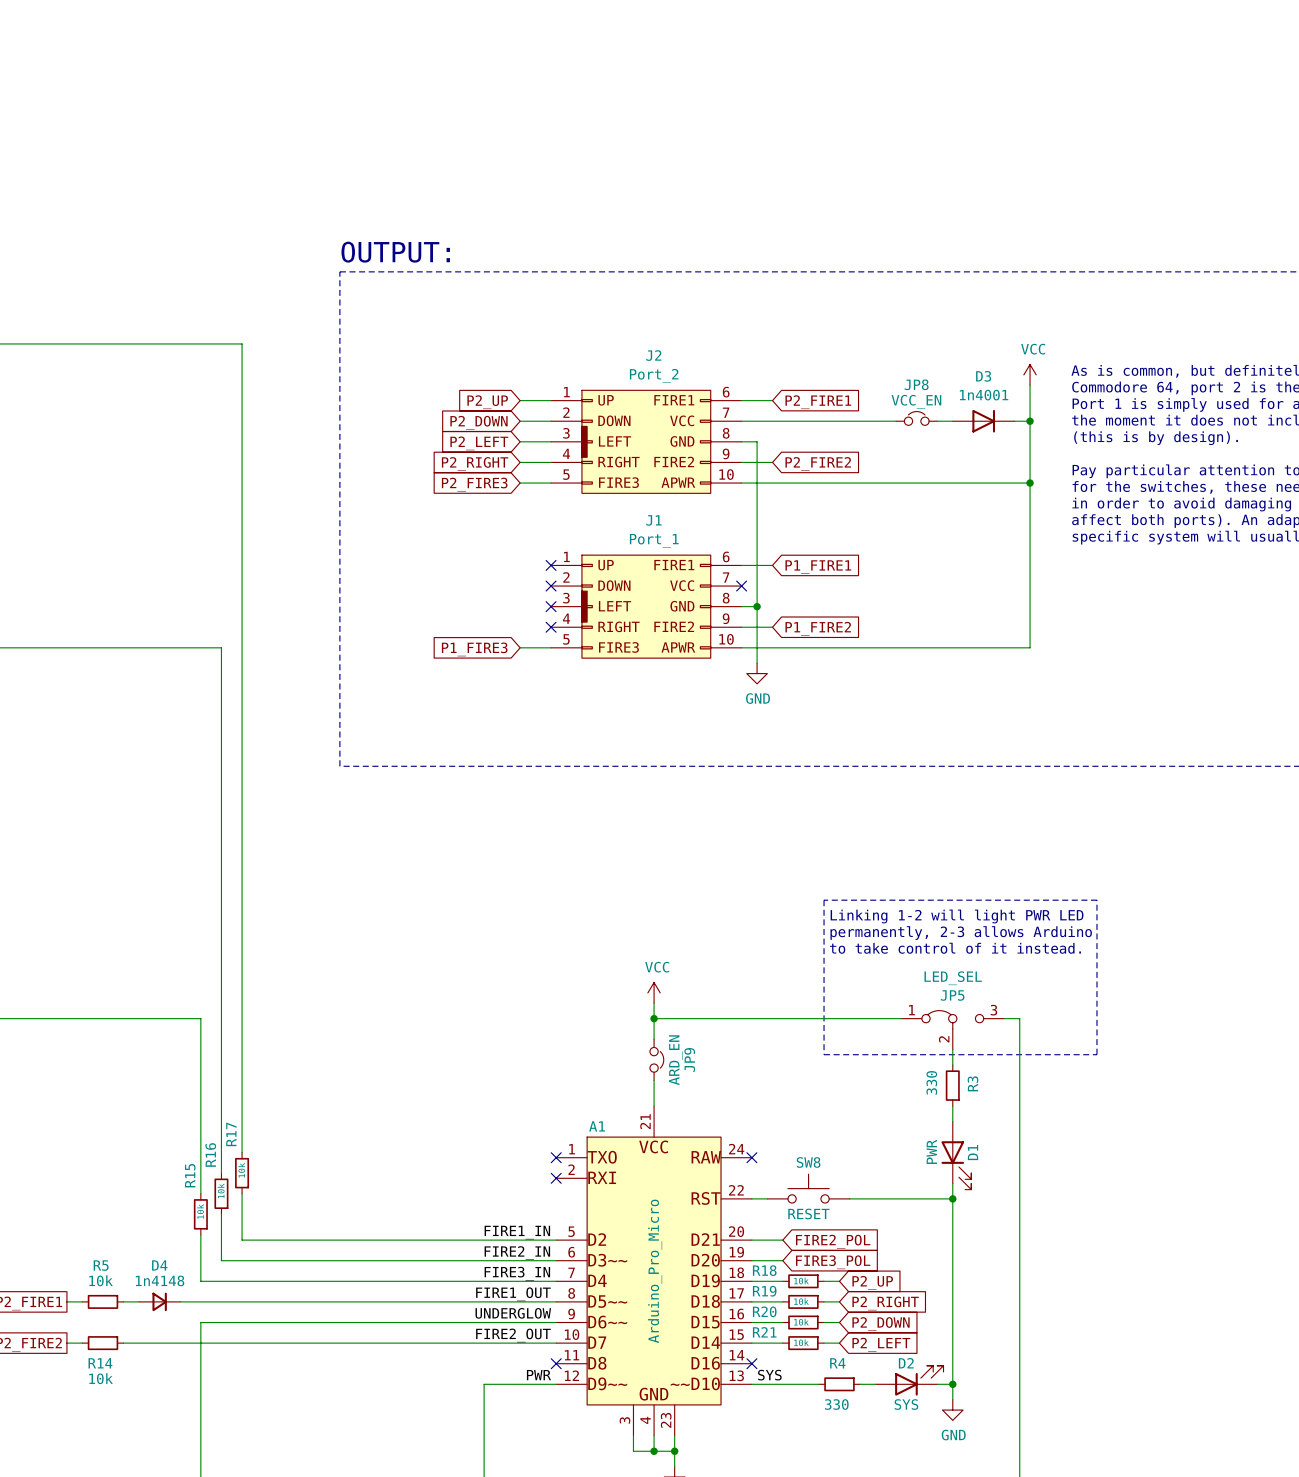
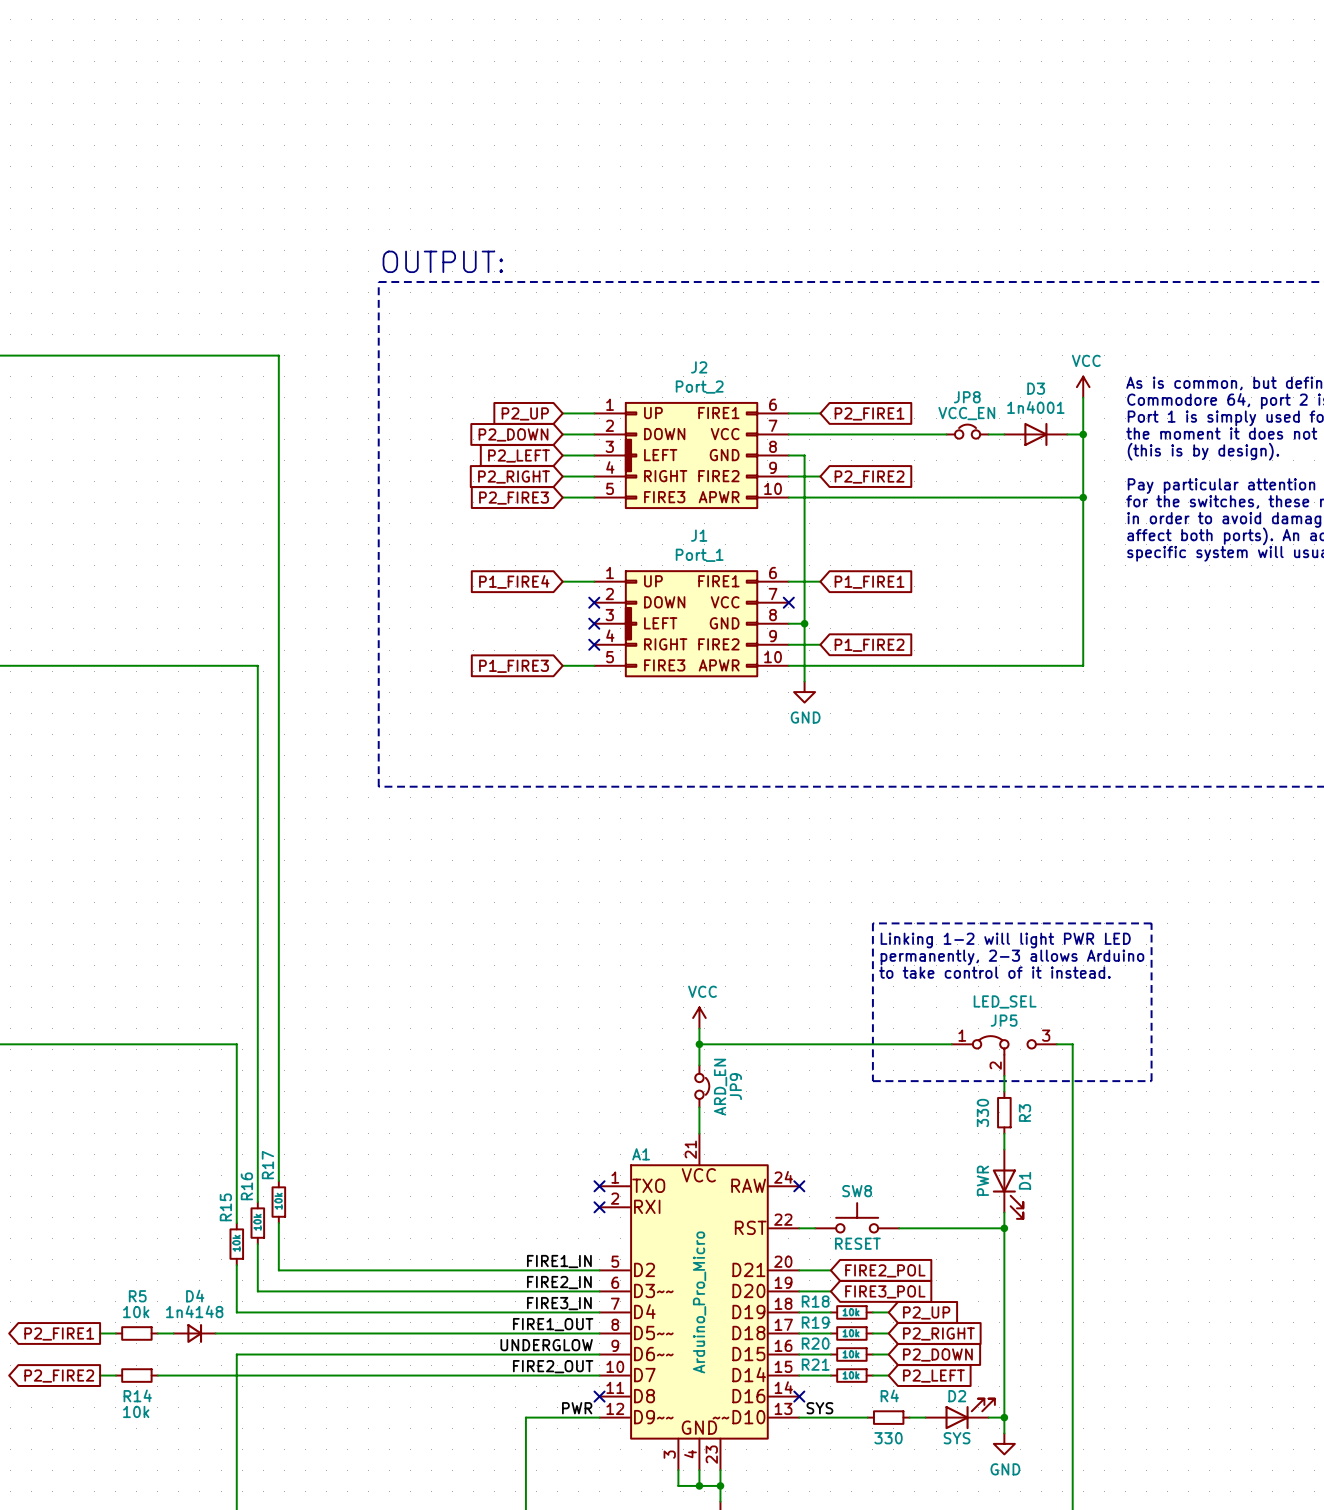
wire: none -> (562, 581) (594, 581)
no-connect mark: (551, 565) -> none
global label: none -> P1_FIRE4 (514, 581)

